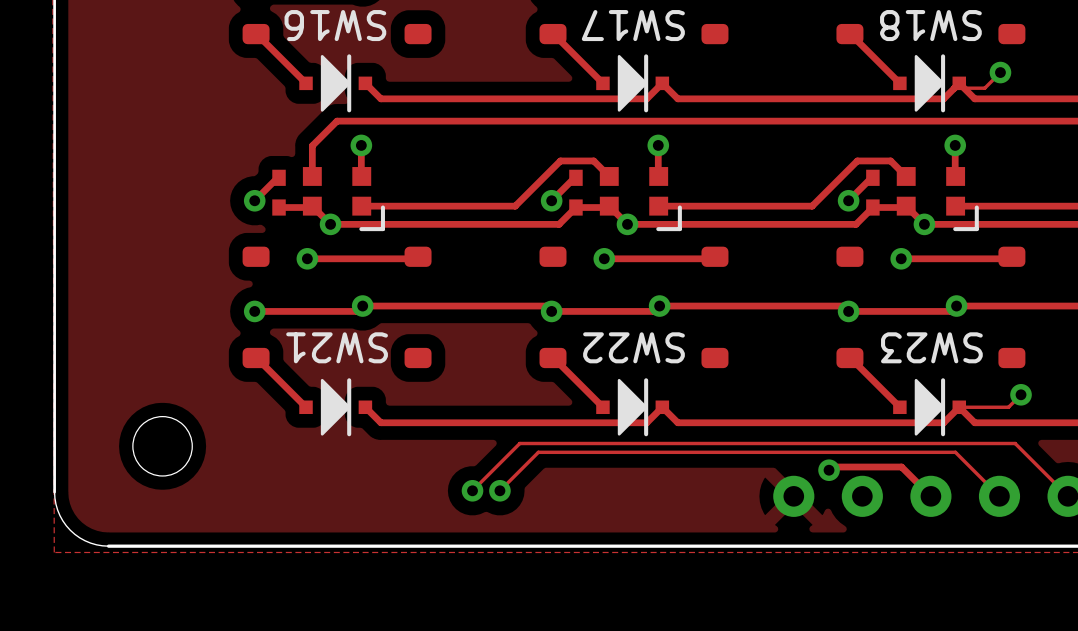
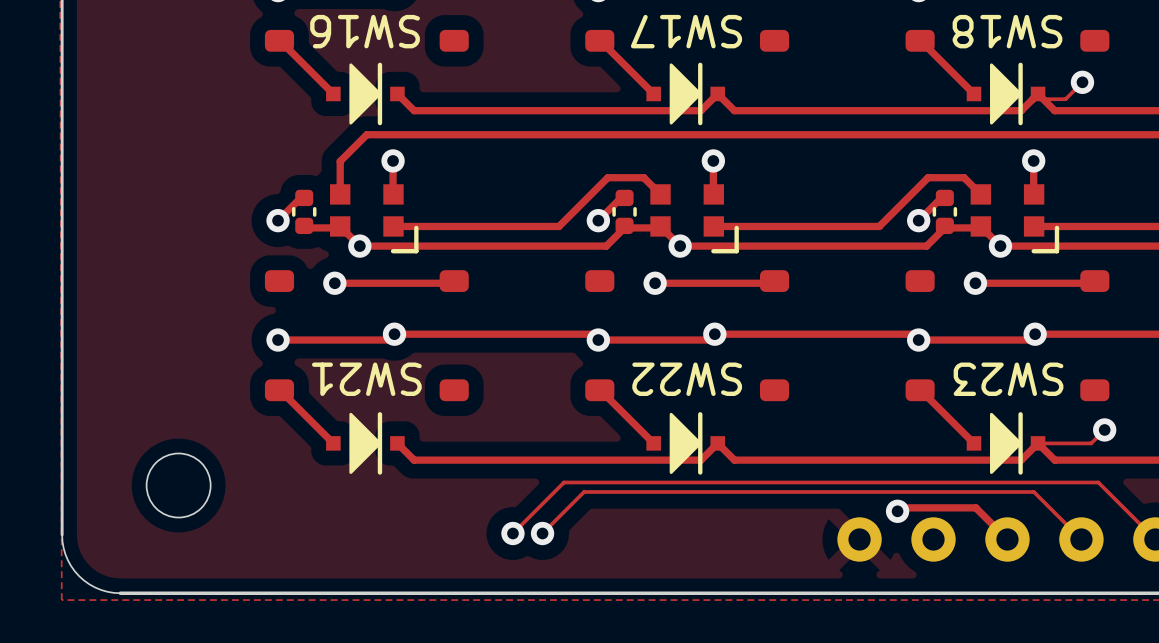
part footprint: [272, 169, 286, 216] -> [292, 189, 317, 235]
part footprint: [569, 169, 583, 216] -> [612, 189, 637, 235]
part footprint: [866, 169, 880, 216] -> [932, 189, 958, 235]

